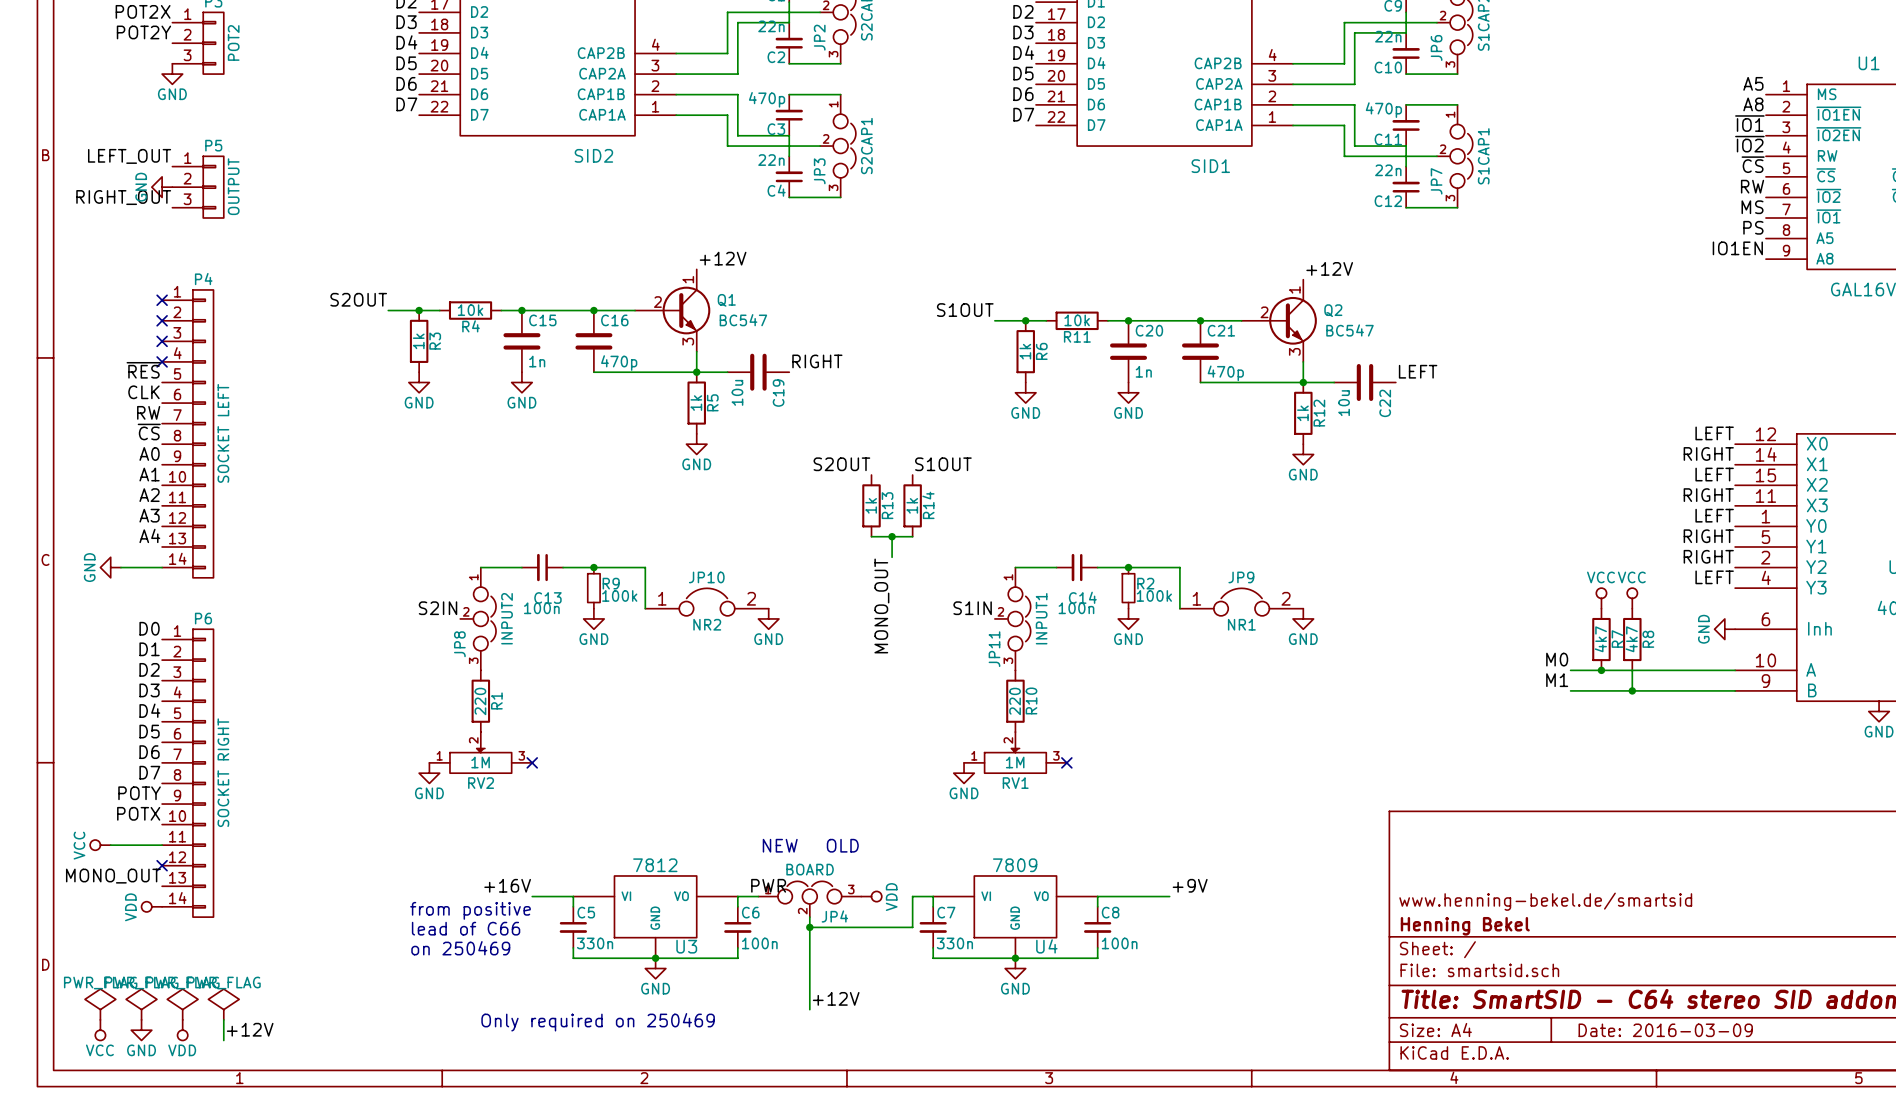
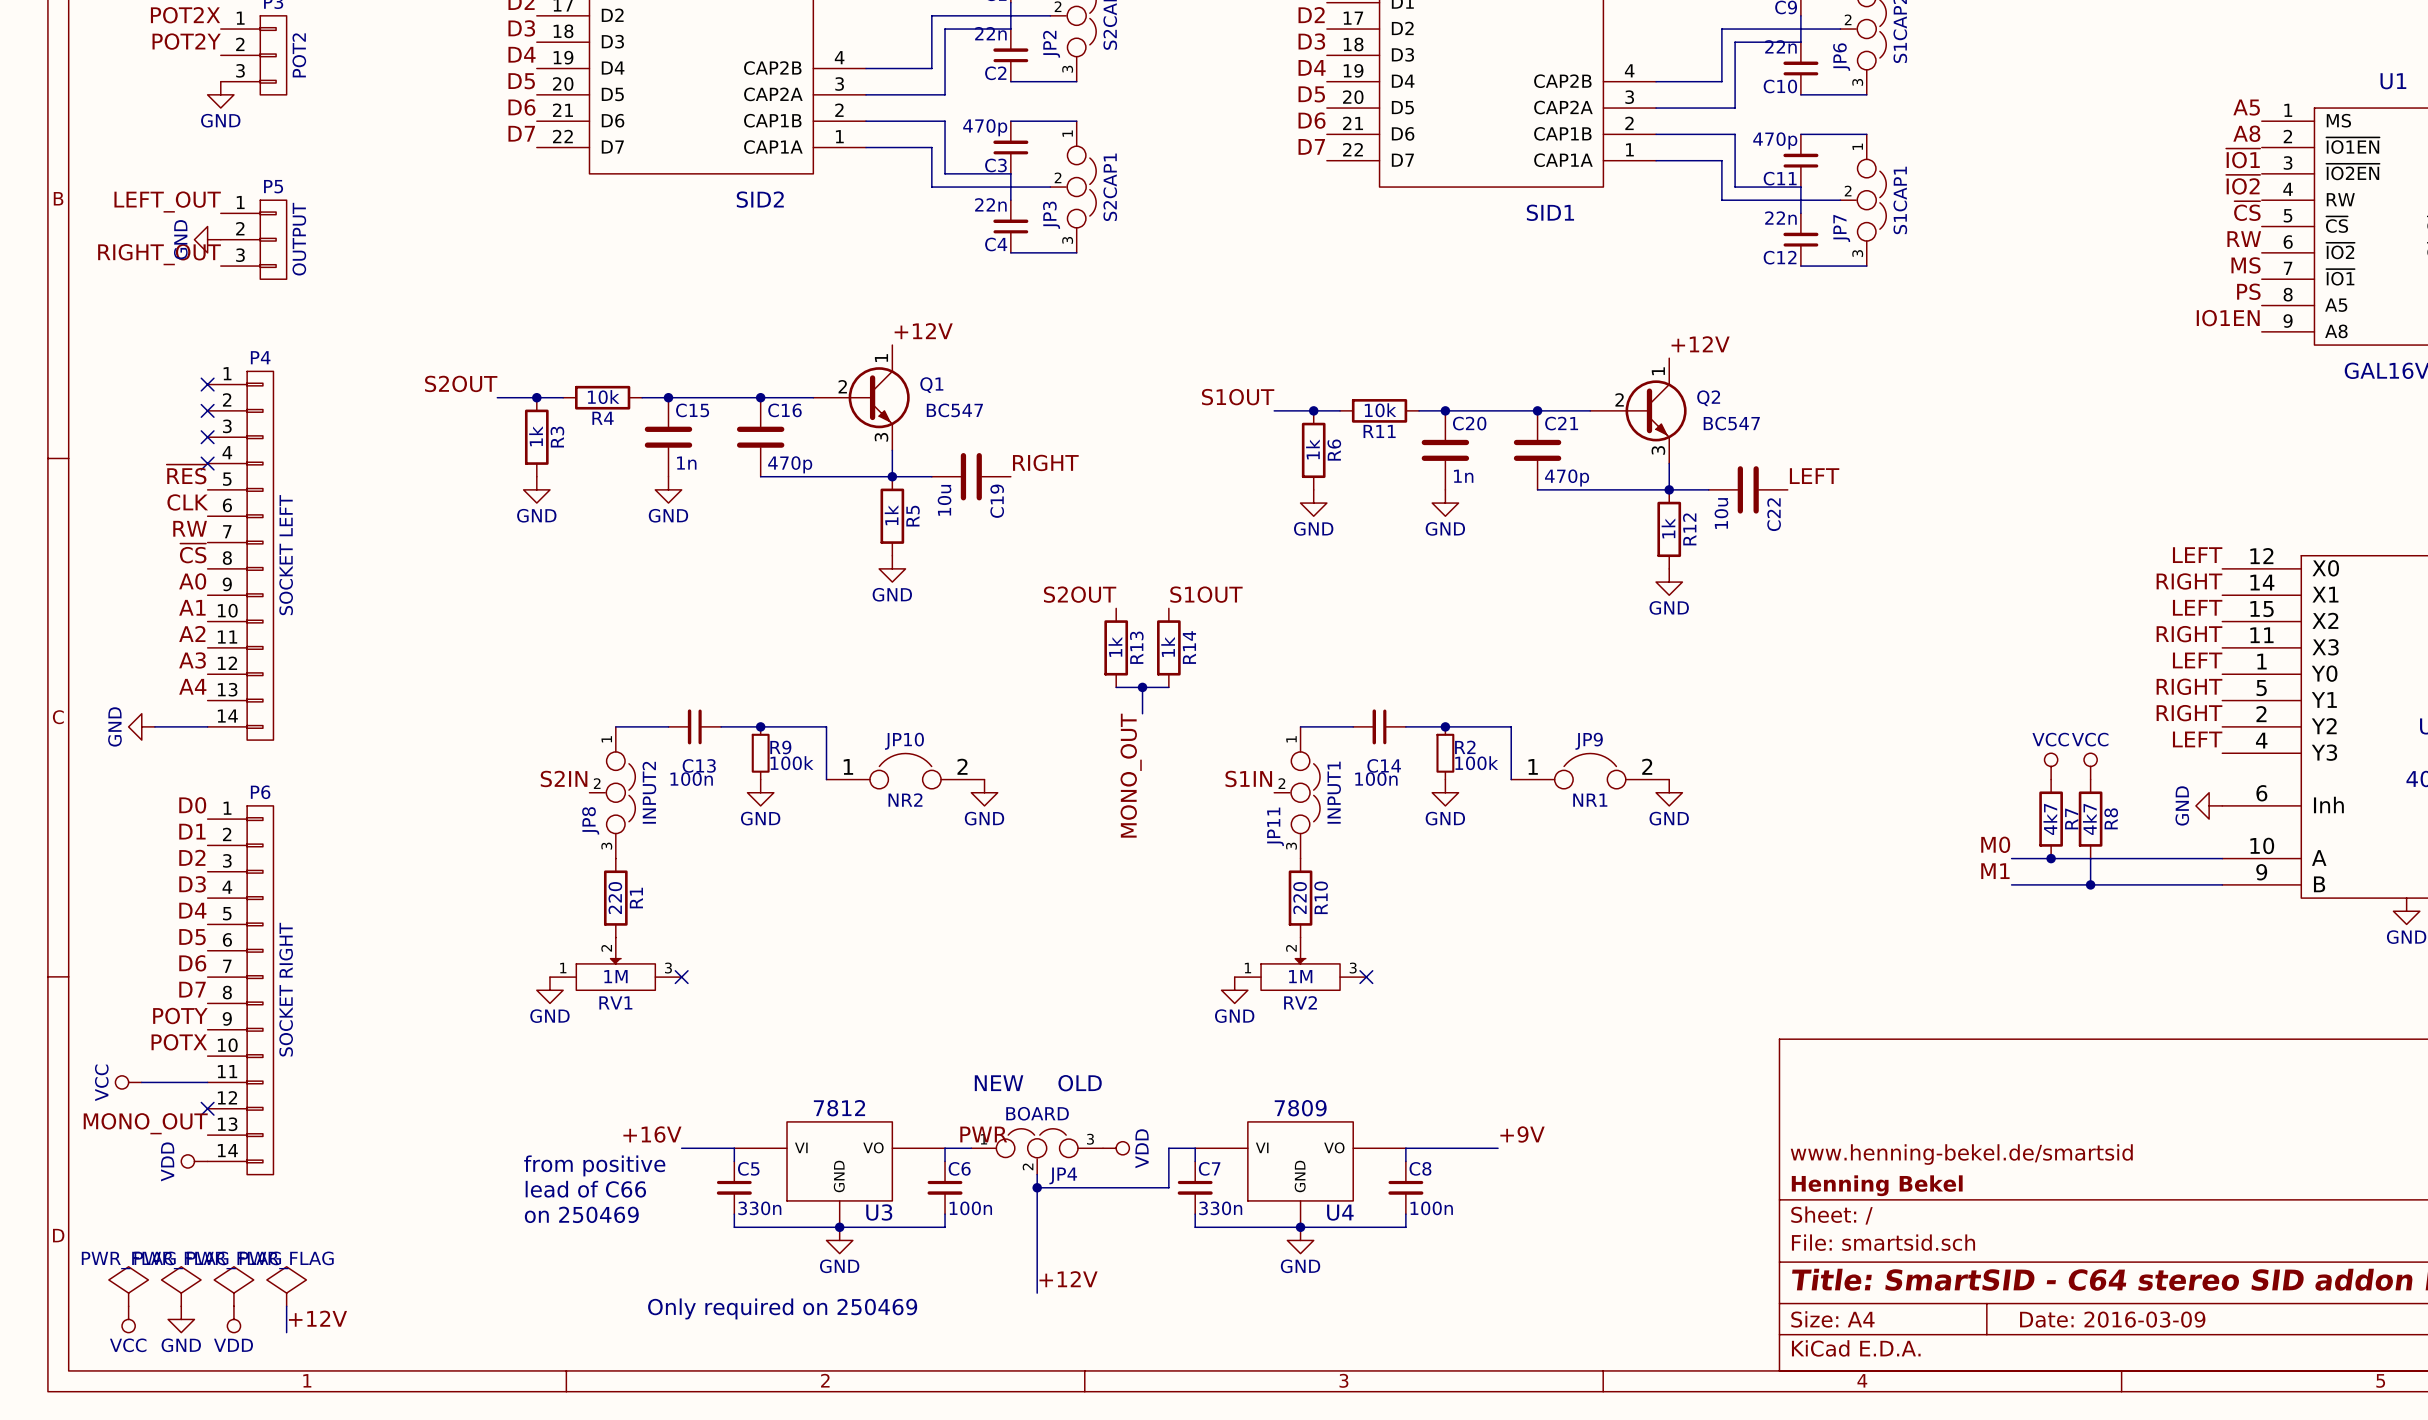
RV2 name: RV2 (481, 783) -> RV1 (615, 1002)
RV1 name: RV1 (1015, 783) -> RV2 (1300, 1002)

